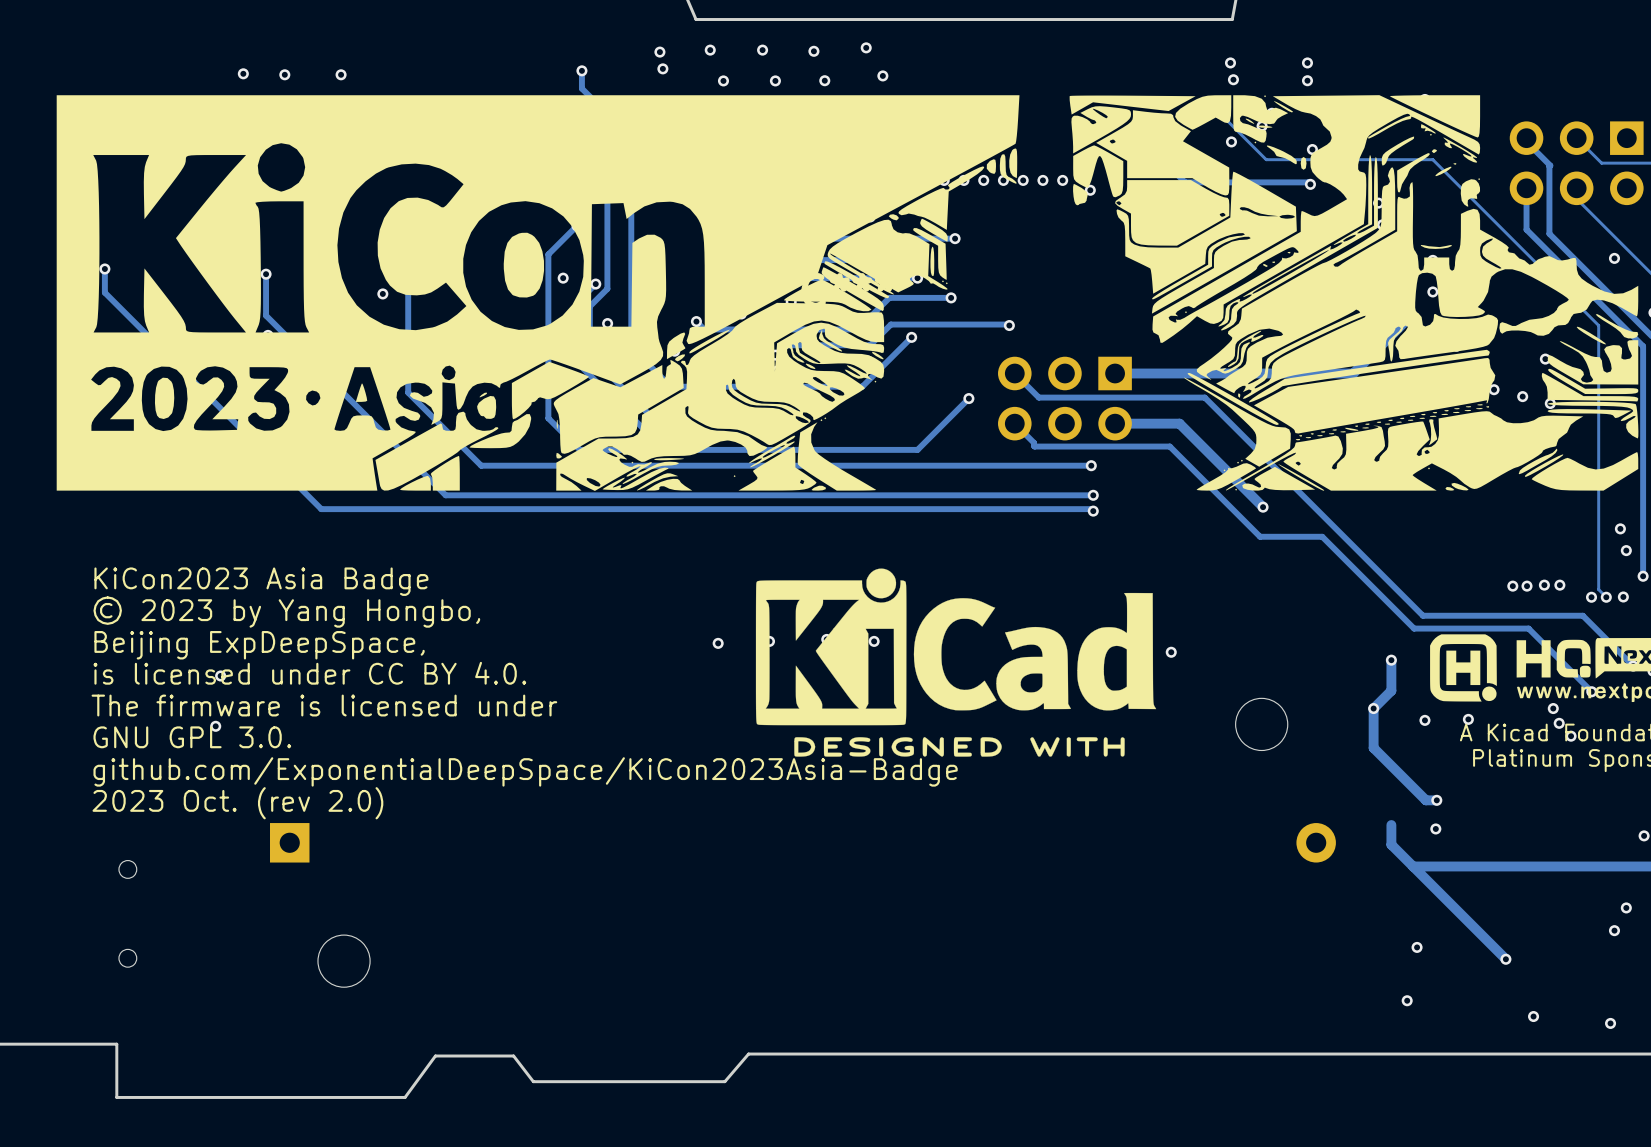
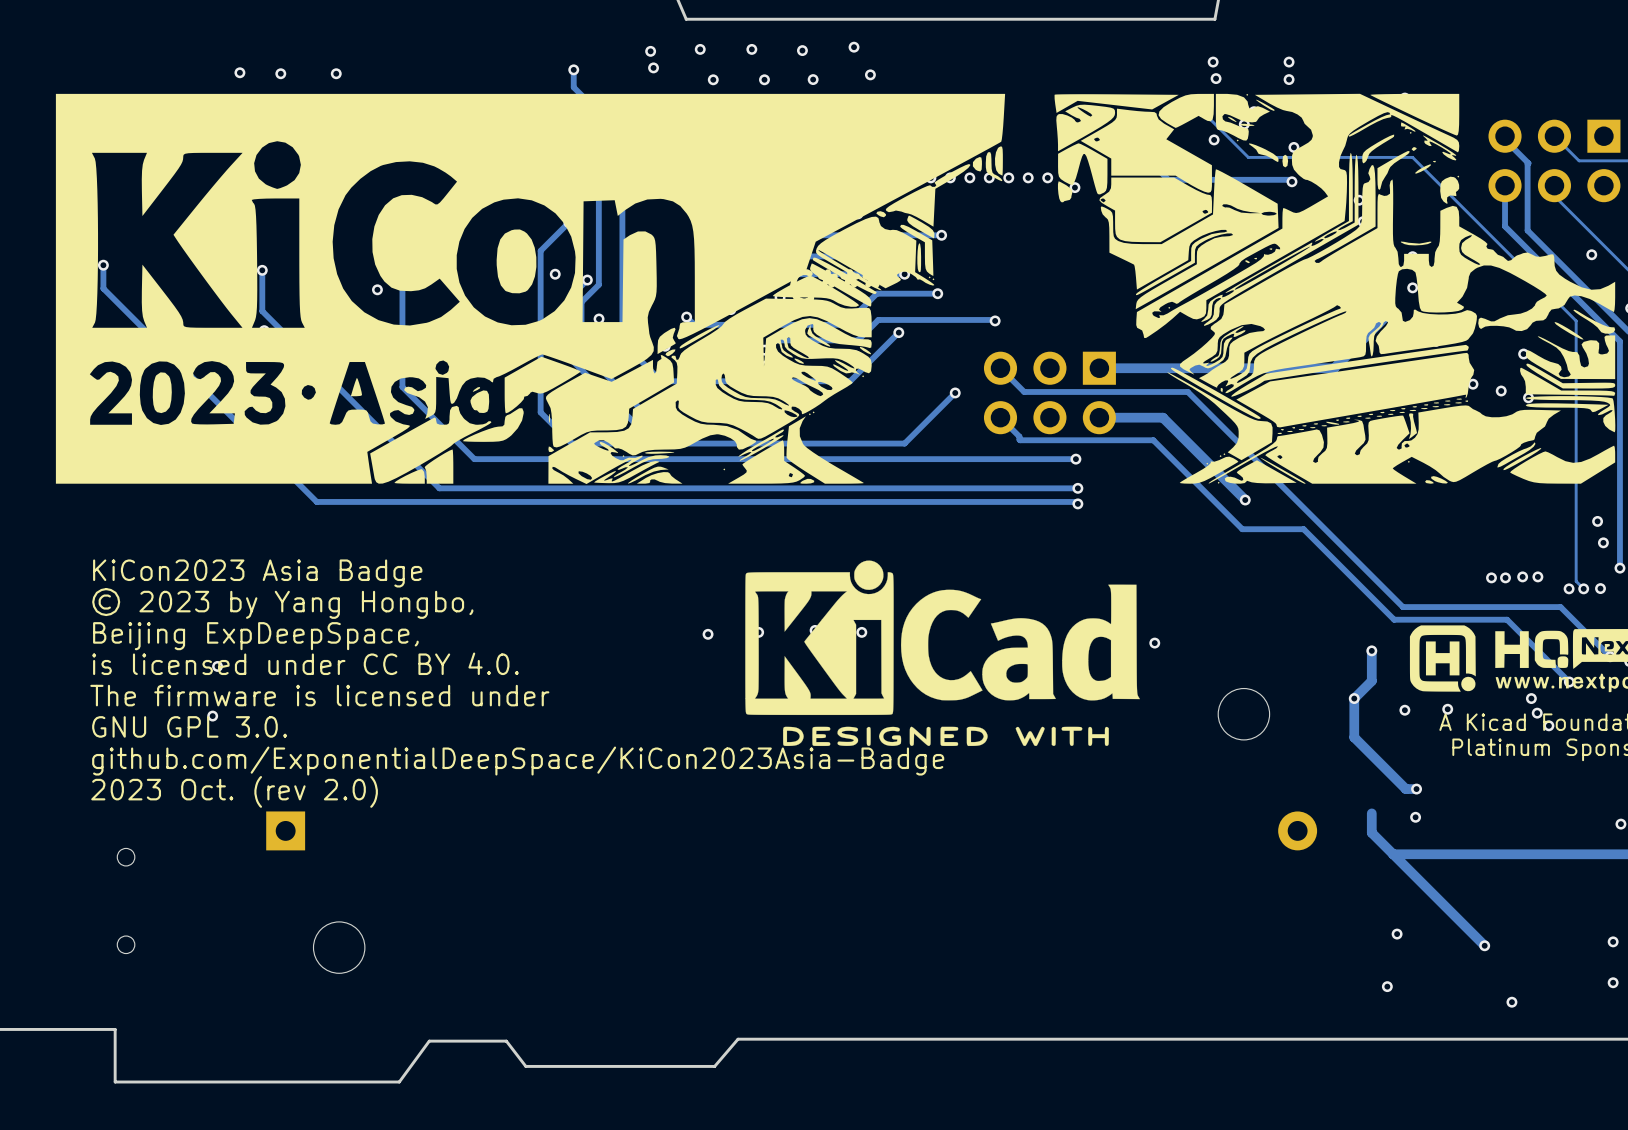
via: (1626, 907) -> none
via: (1614, 930) -> none
via: none -> (1613, 941)
via: none -> (1613, 982)
via: (1610, 1023) -> none

